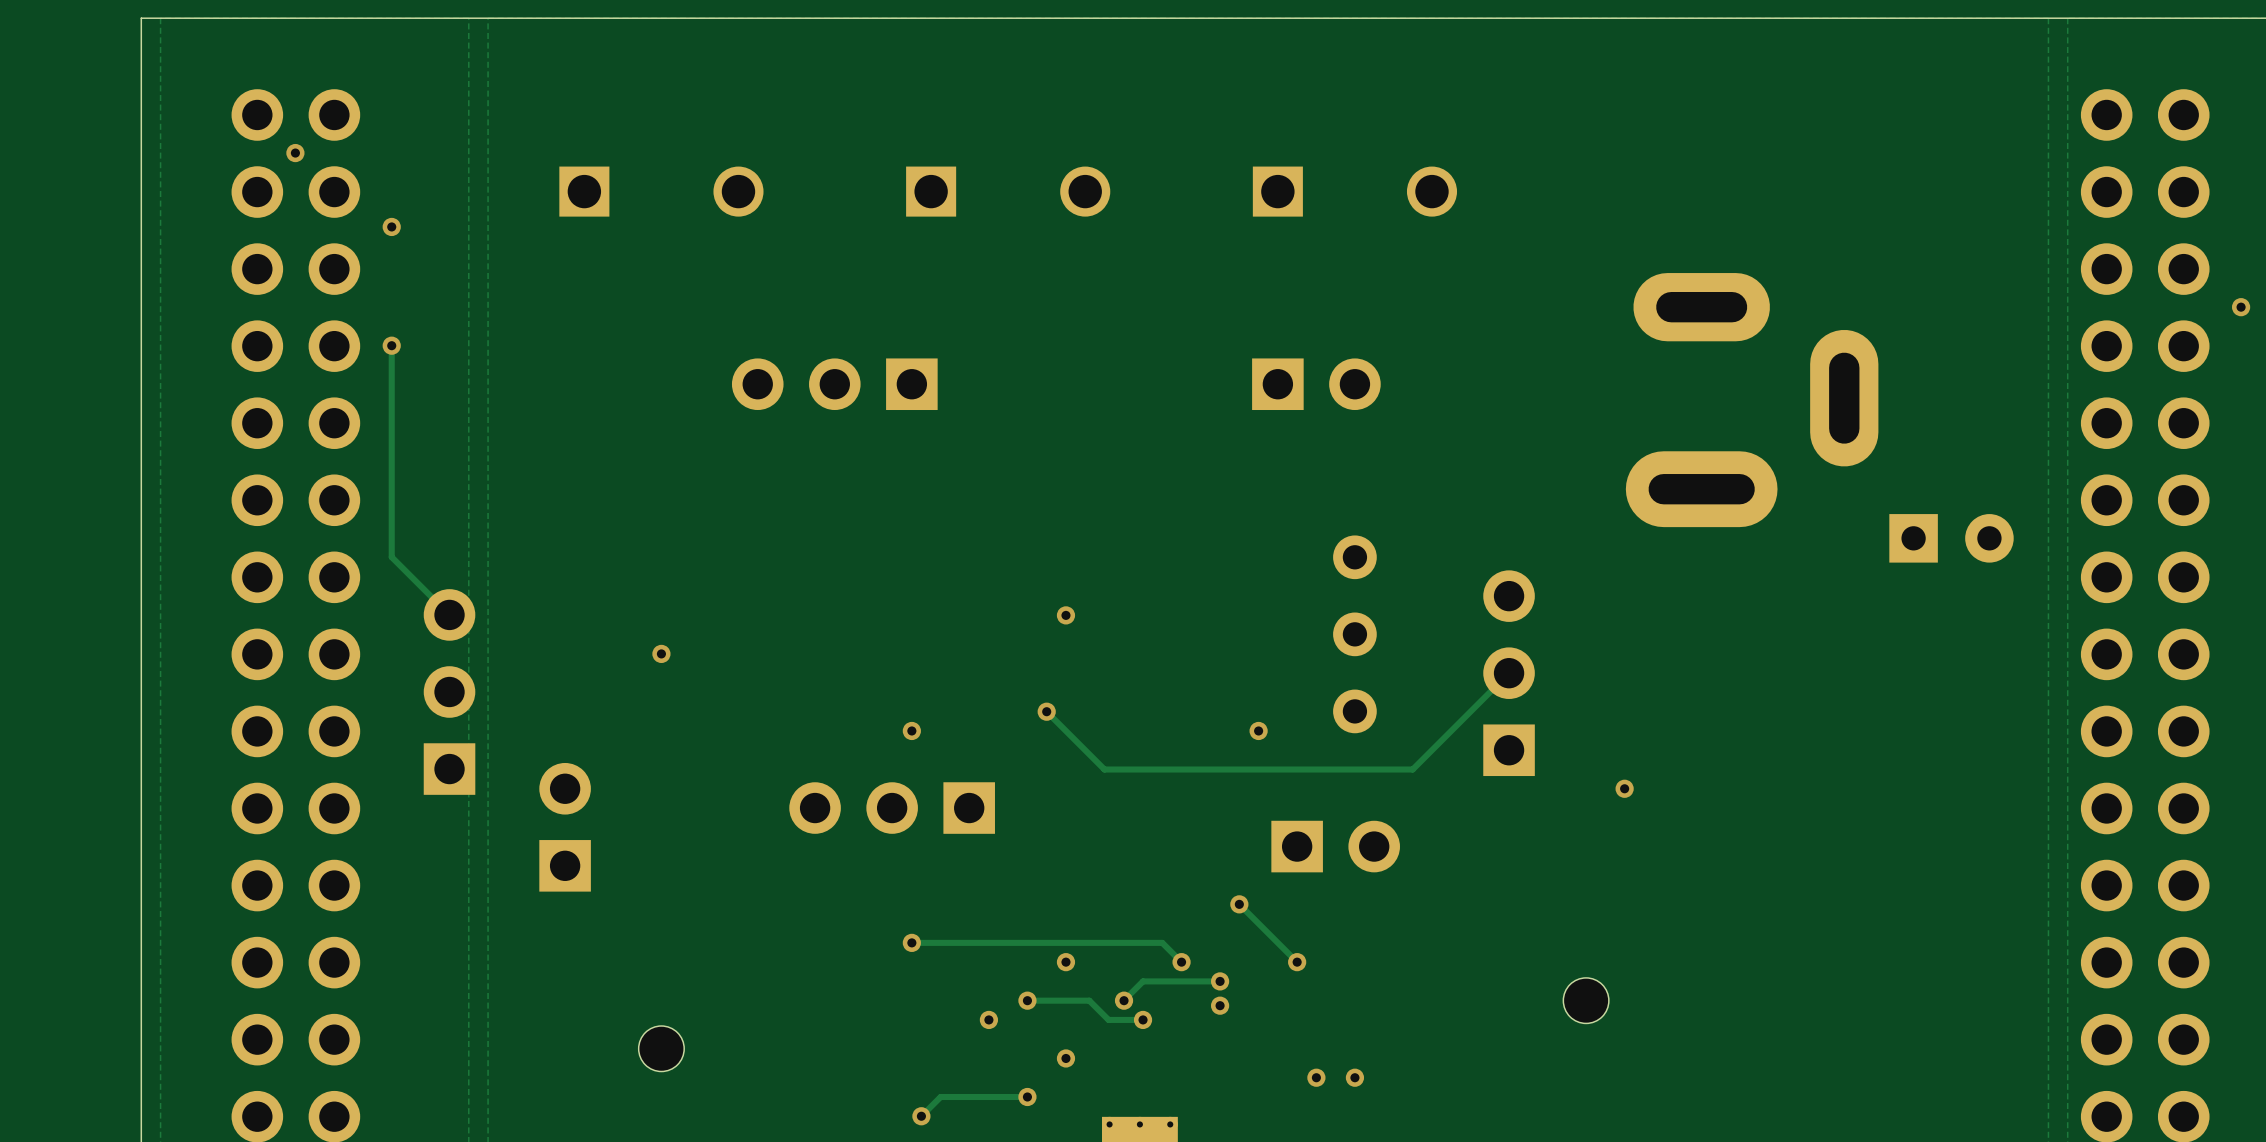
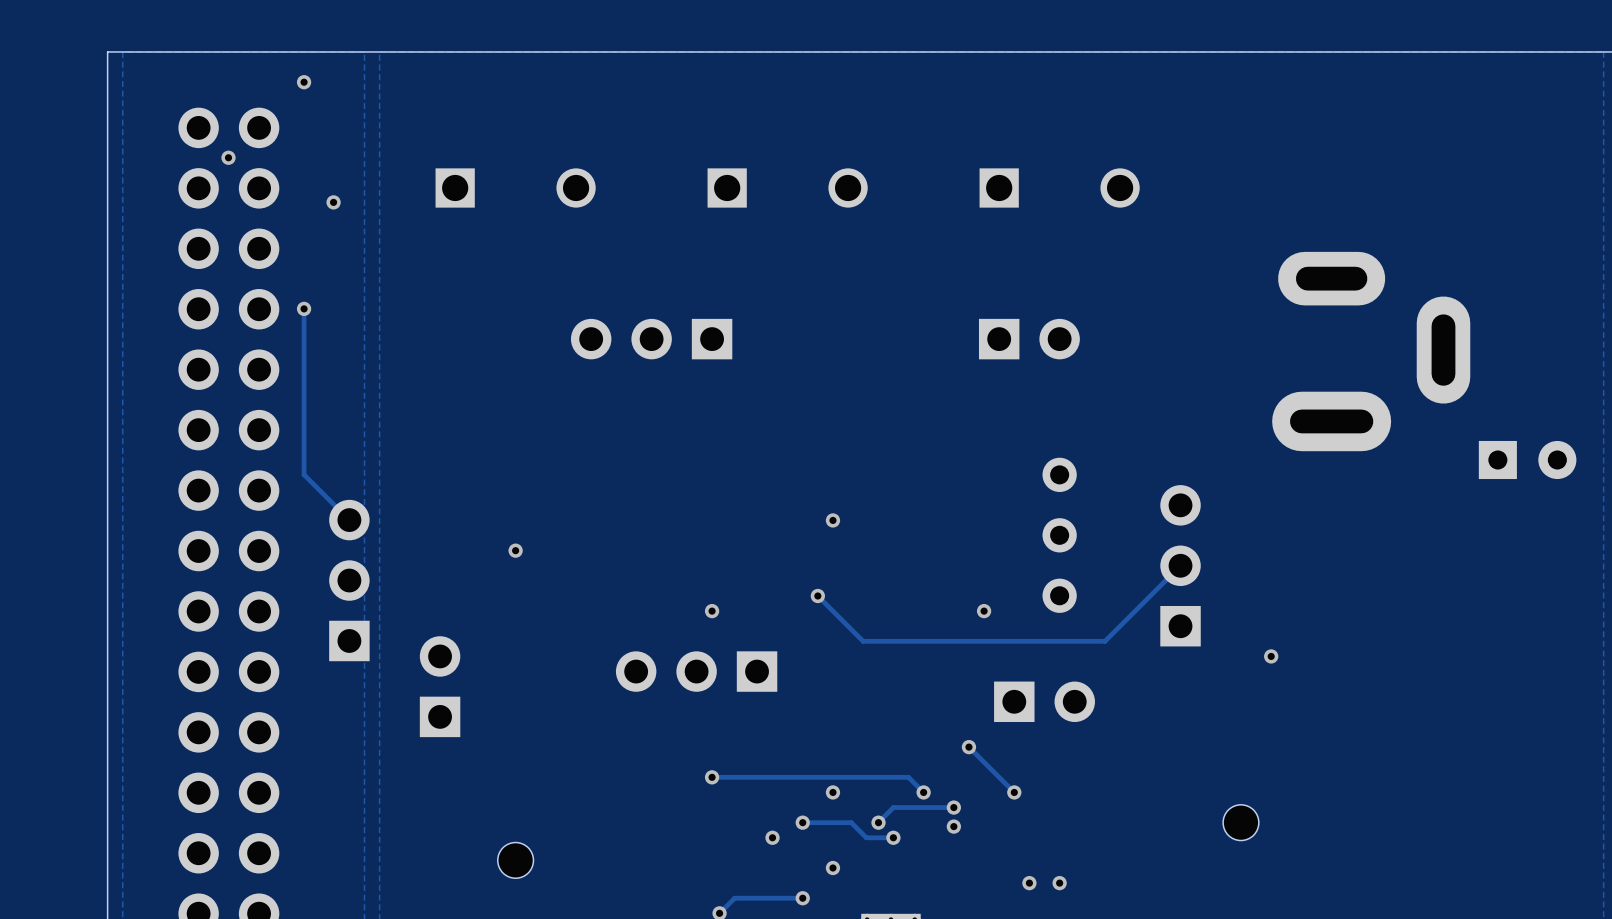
via: none -> (304, 82)
via position: (391, 226) -> (333, 202)

